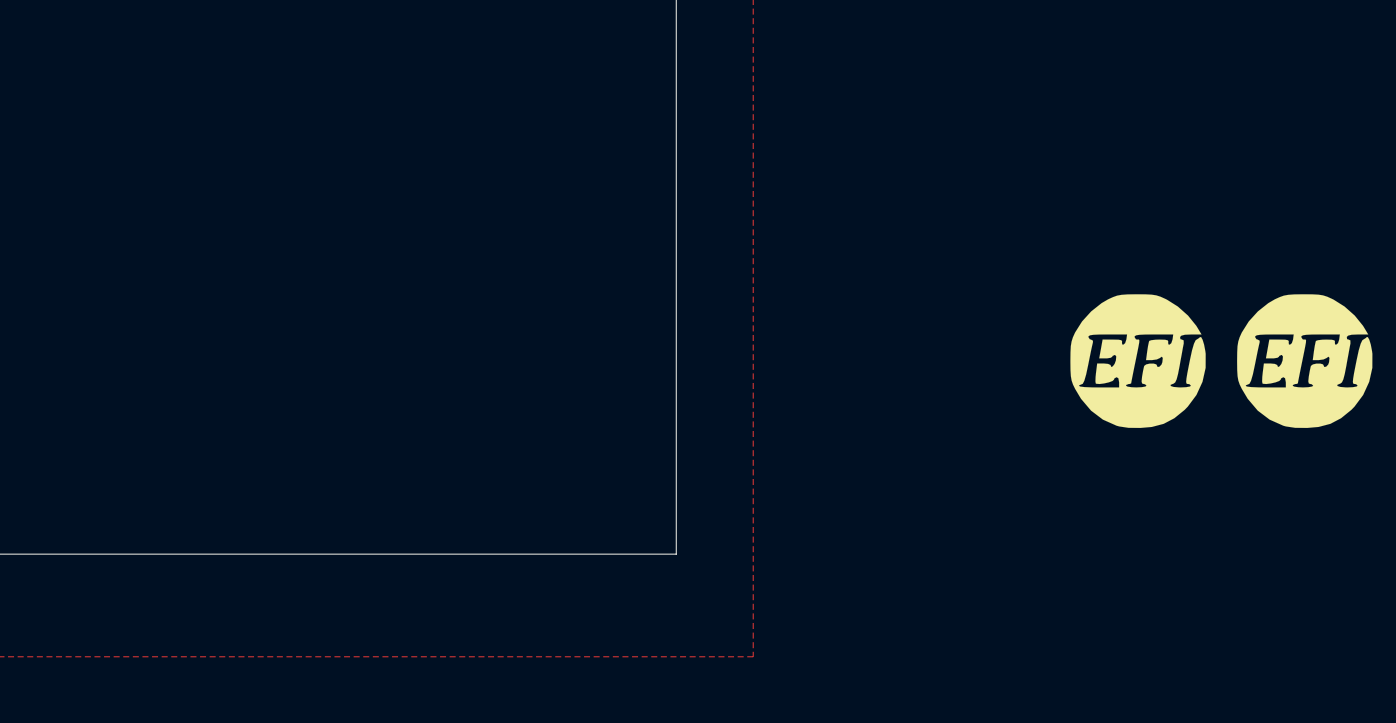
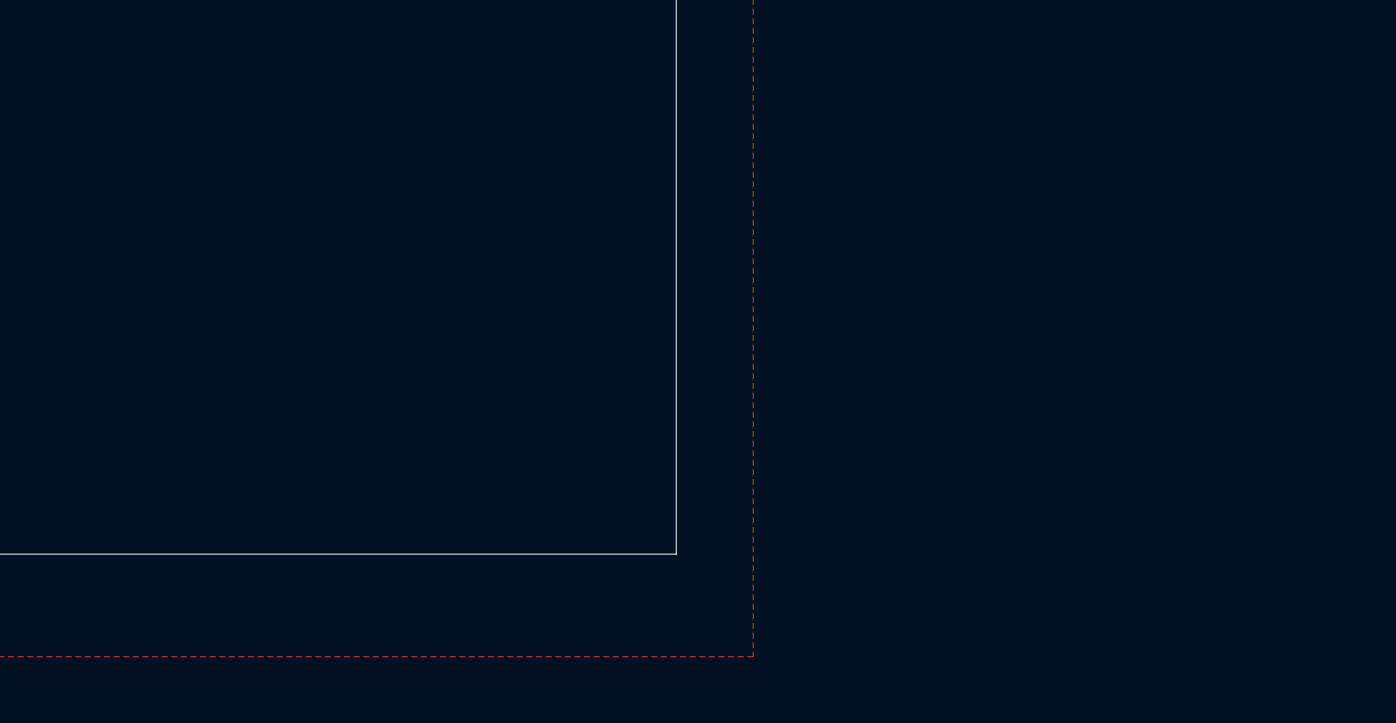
drawing: [1070, 294, 1206, 428] -> none
drawing: [1237, 294, 1373, 428] -> none

